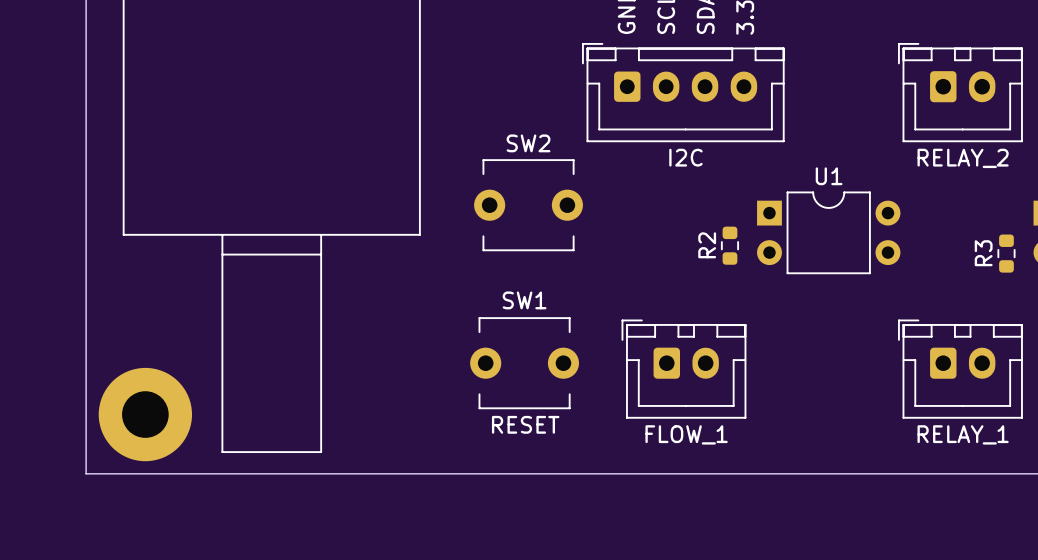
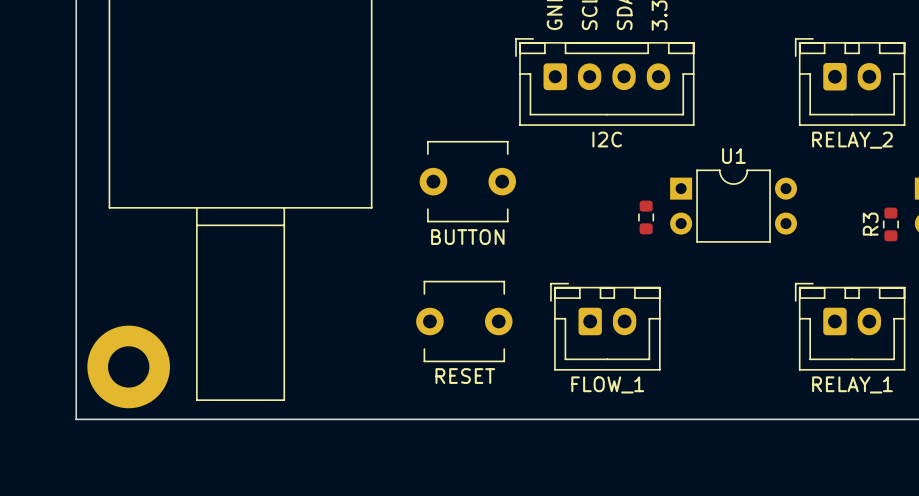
SW2 name: SW2 (528, 143) -> none
R2 name: R2 (707, 245) -> none
SW2 value: none -> BUTTON (467, 237)
SW1 name: SW1 (524, 300) -> none

